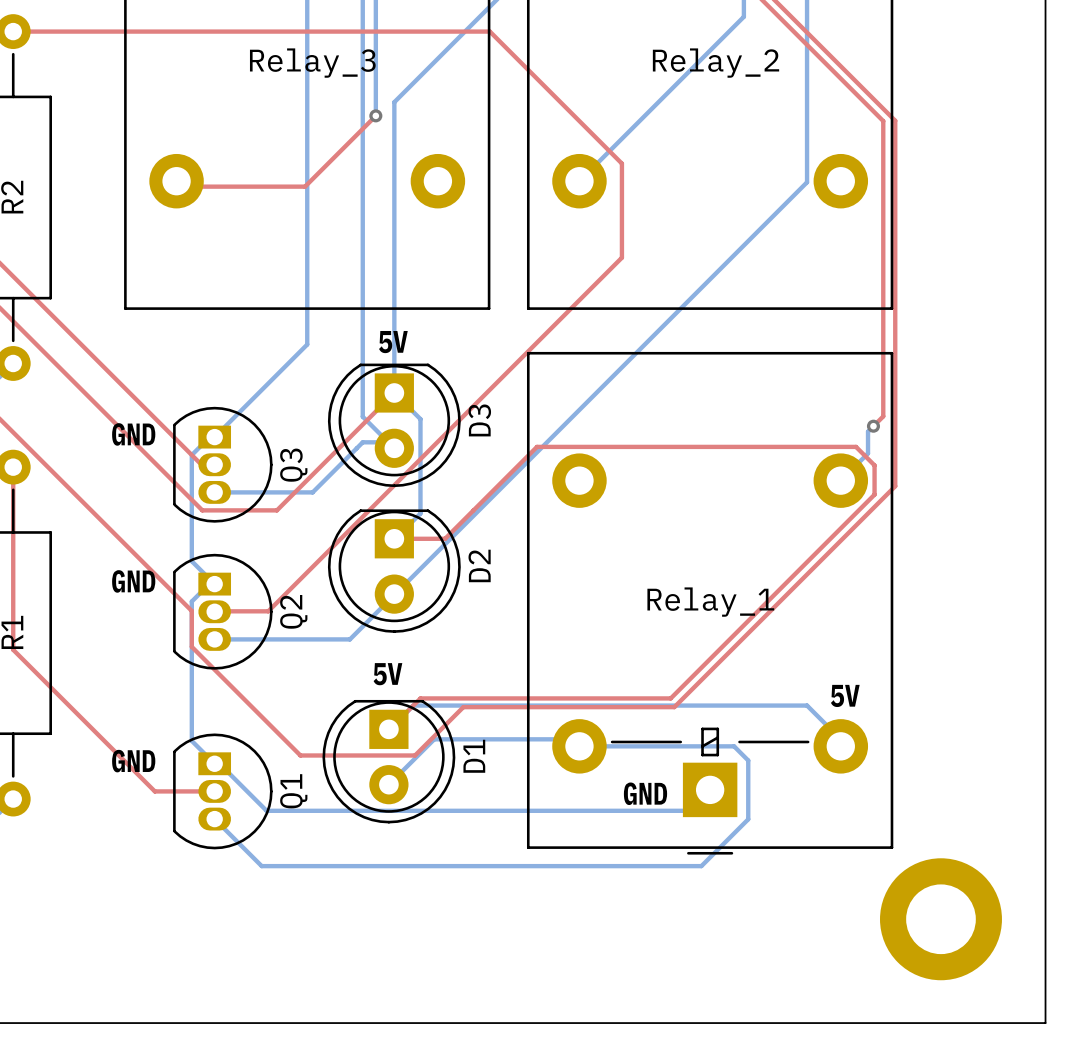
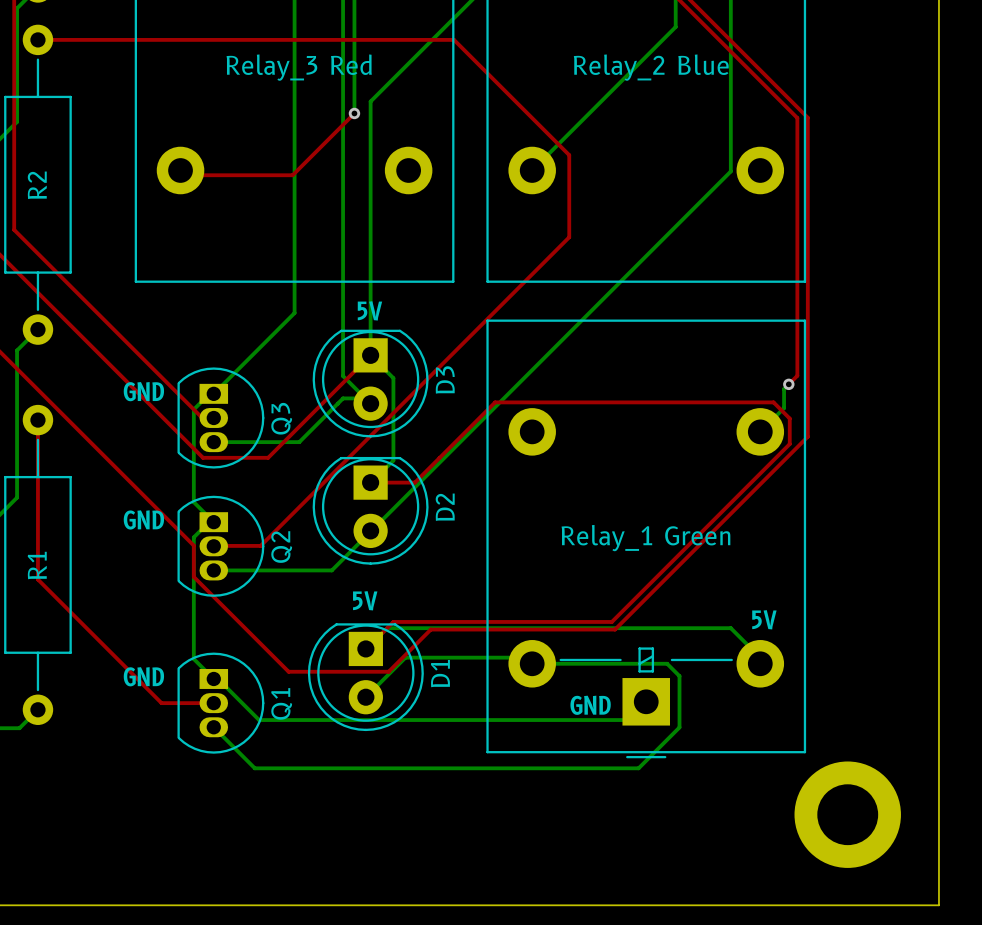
Relay_3 name: Relay_3 (312, 63) -> Relay_3 Red (299, 67)
Relay_2 name: Relay_2 (716, 63) -> Relay_2 Blue (651, 67)
Relay_1 name: Relay_1 (710, 602) -> Relay_1 Green (645, 538)

